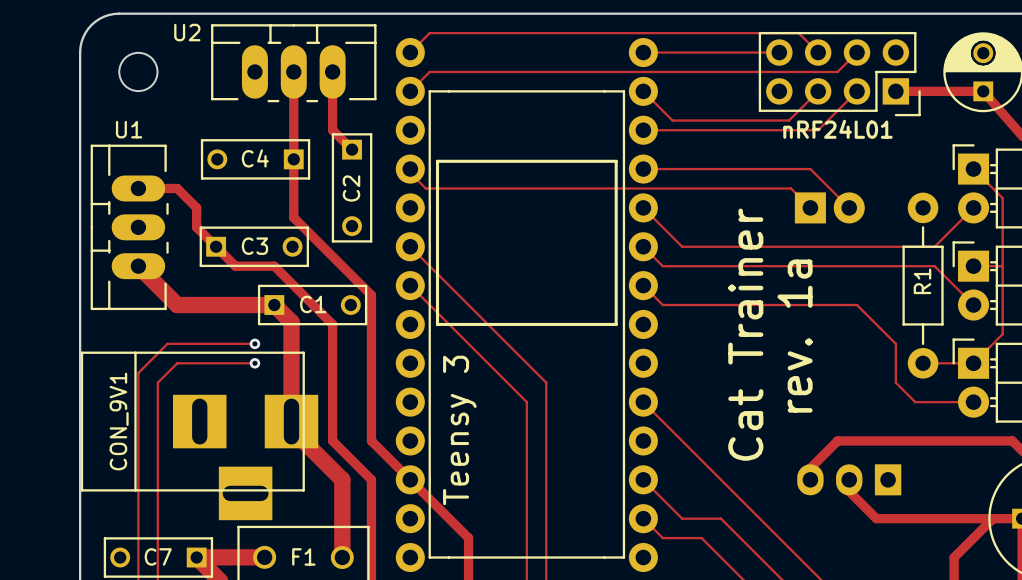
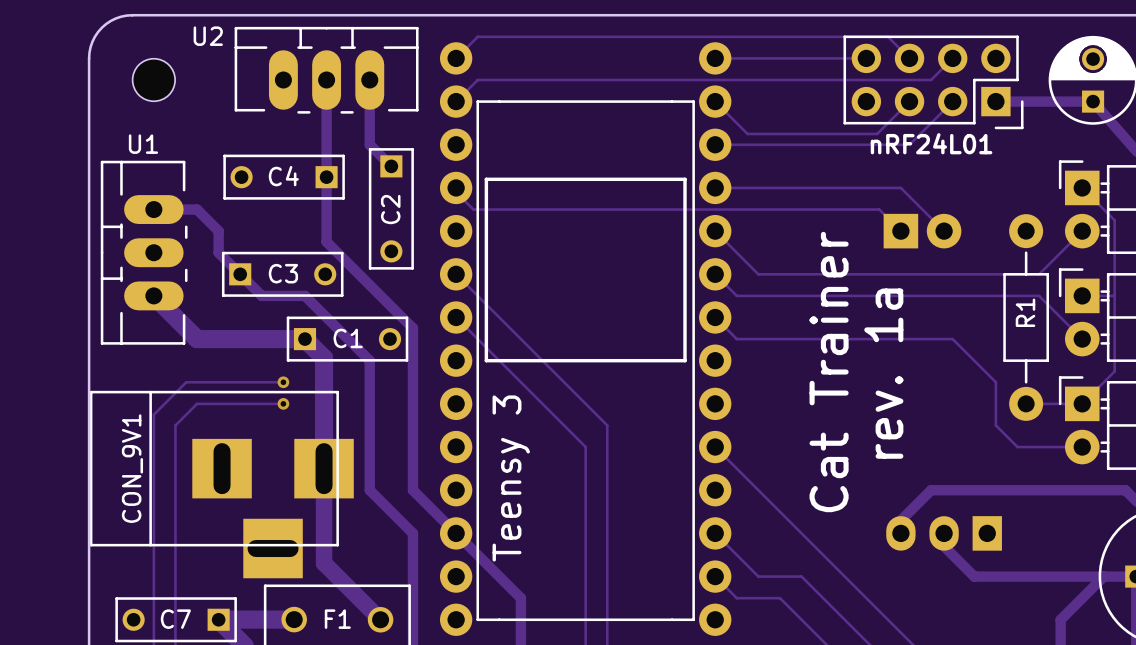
track: (291, 428) (342, 479) (342, 557) -> (324, 476) (324, 563) (380, 619)

